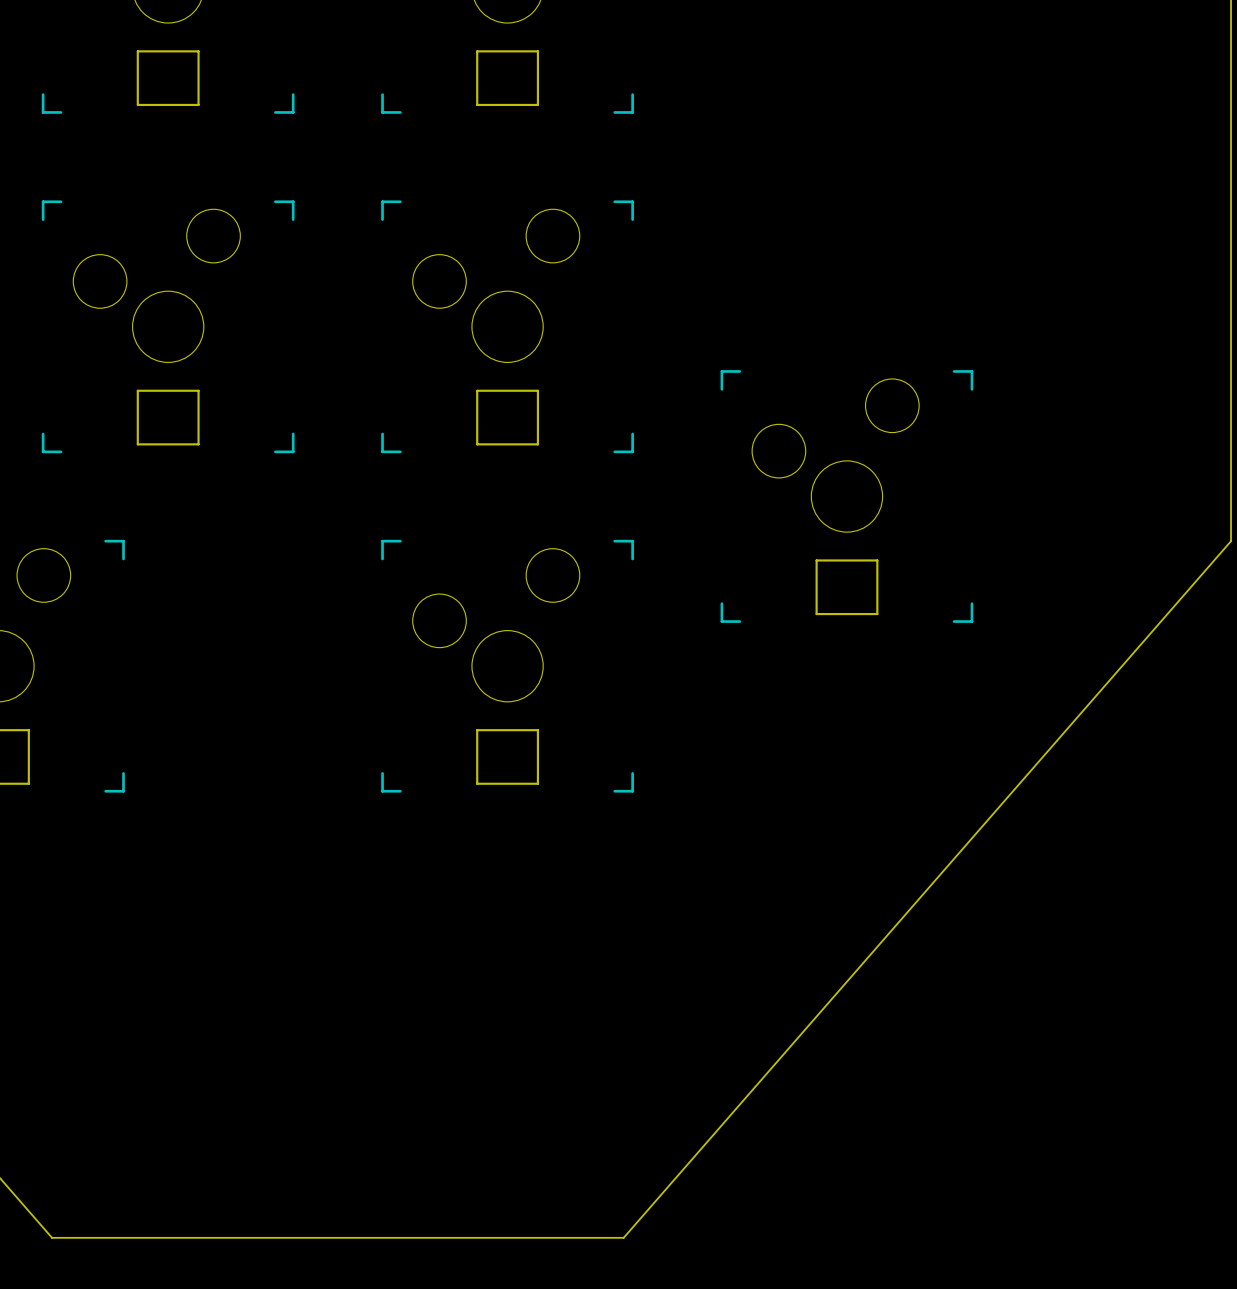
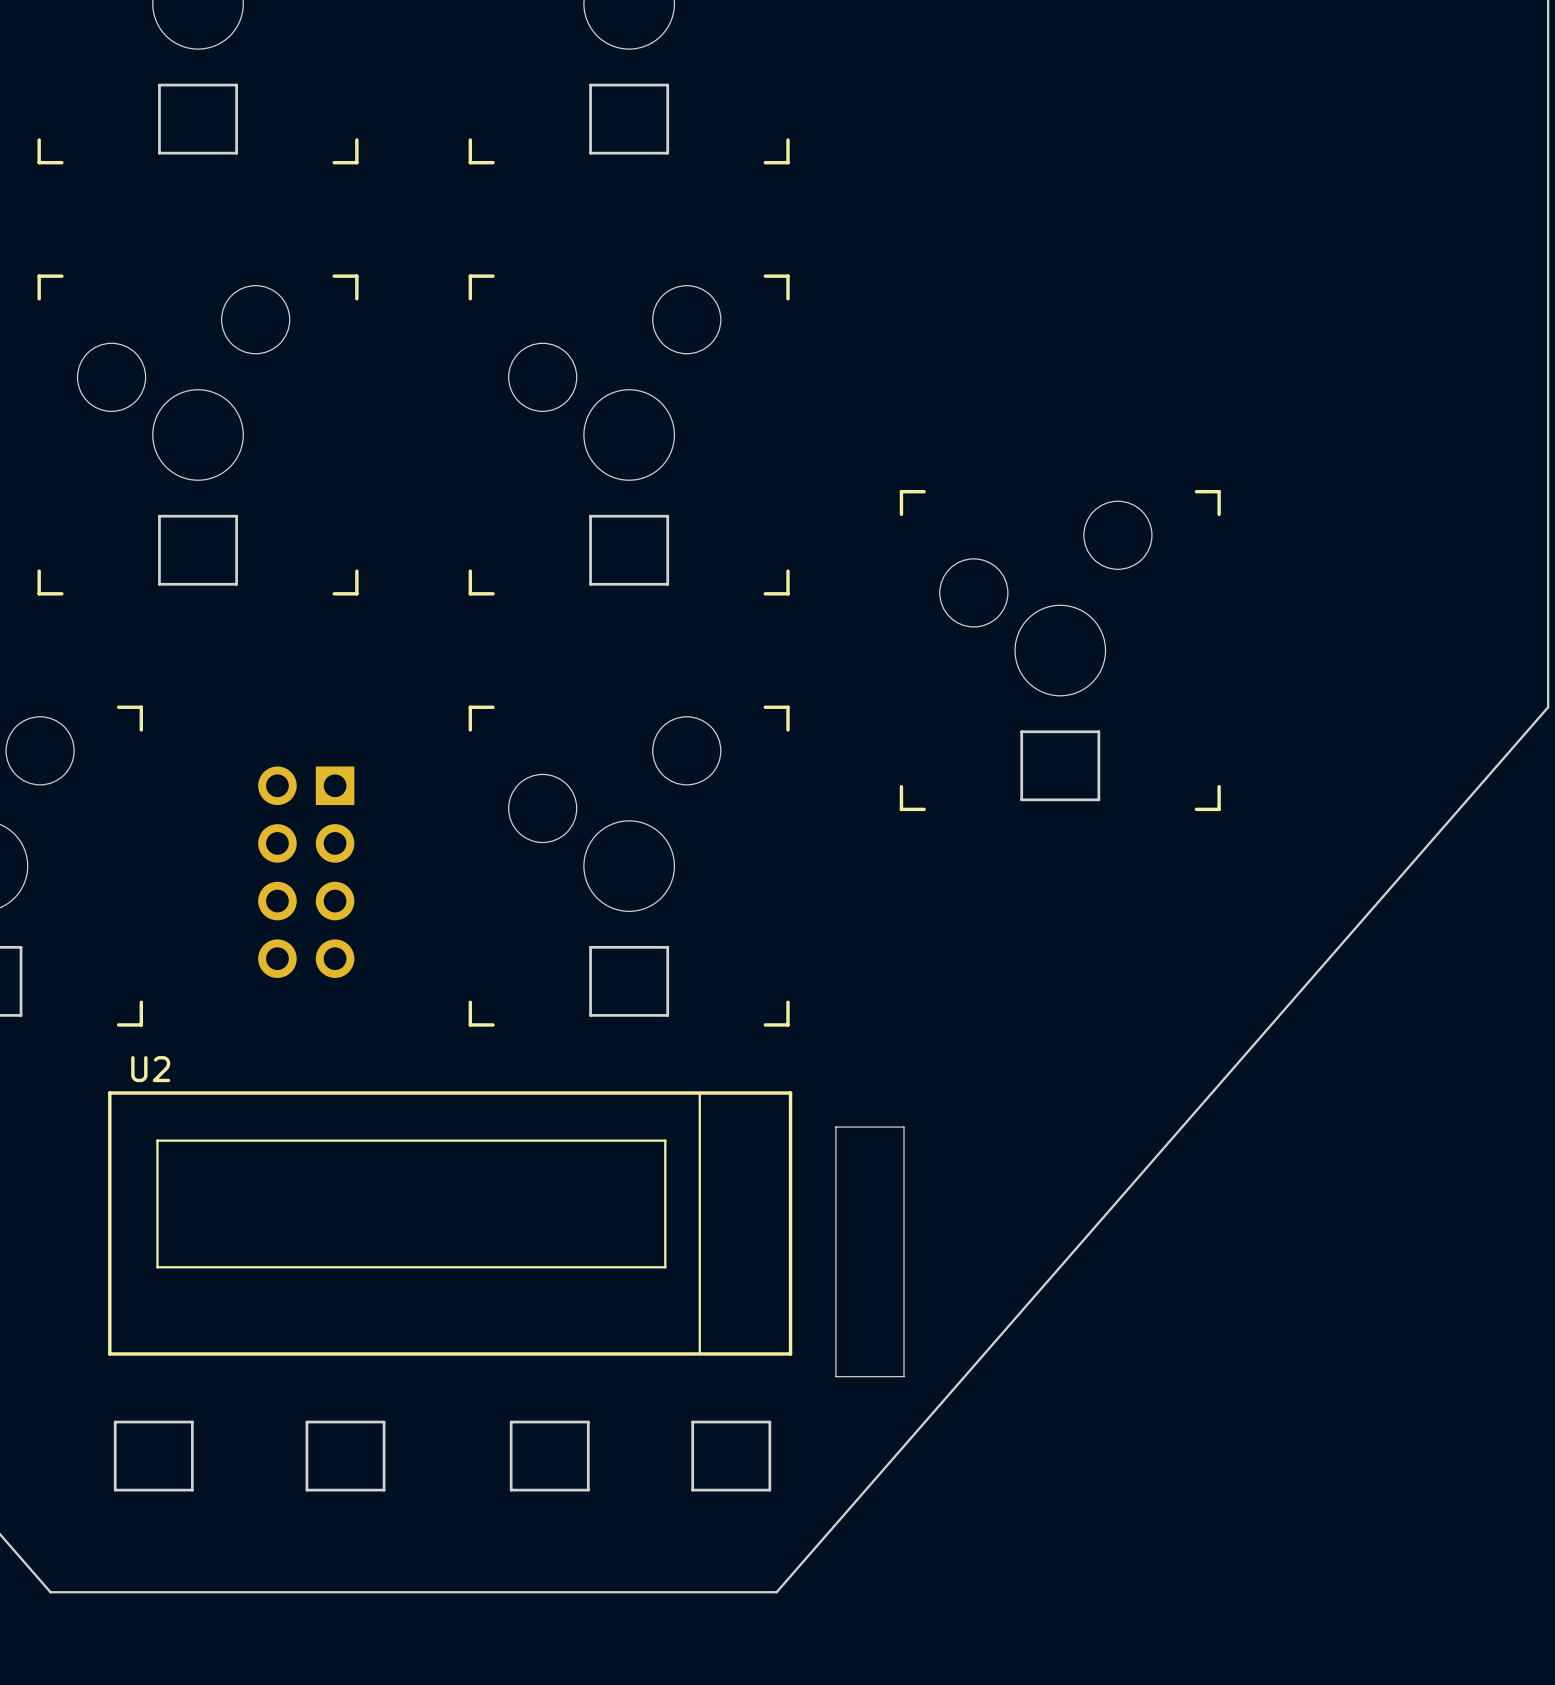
part: none -> (306, 872)
U2: none -> (506, 1234)
part: none -> (153, 1456)
part: none -> (345, 1456)
part: none -> (549, 1456)
part: none -> (731, 1456)

